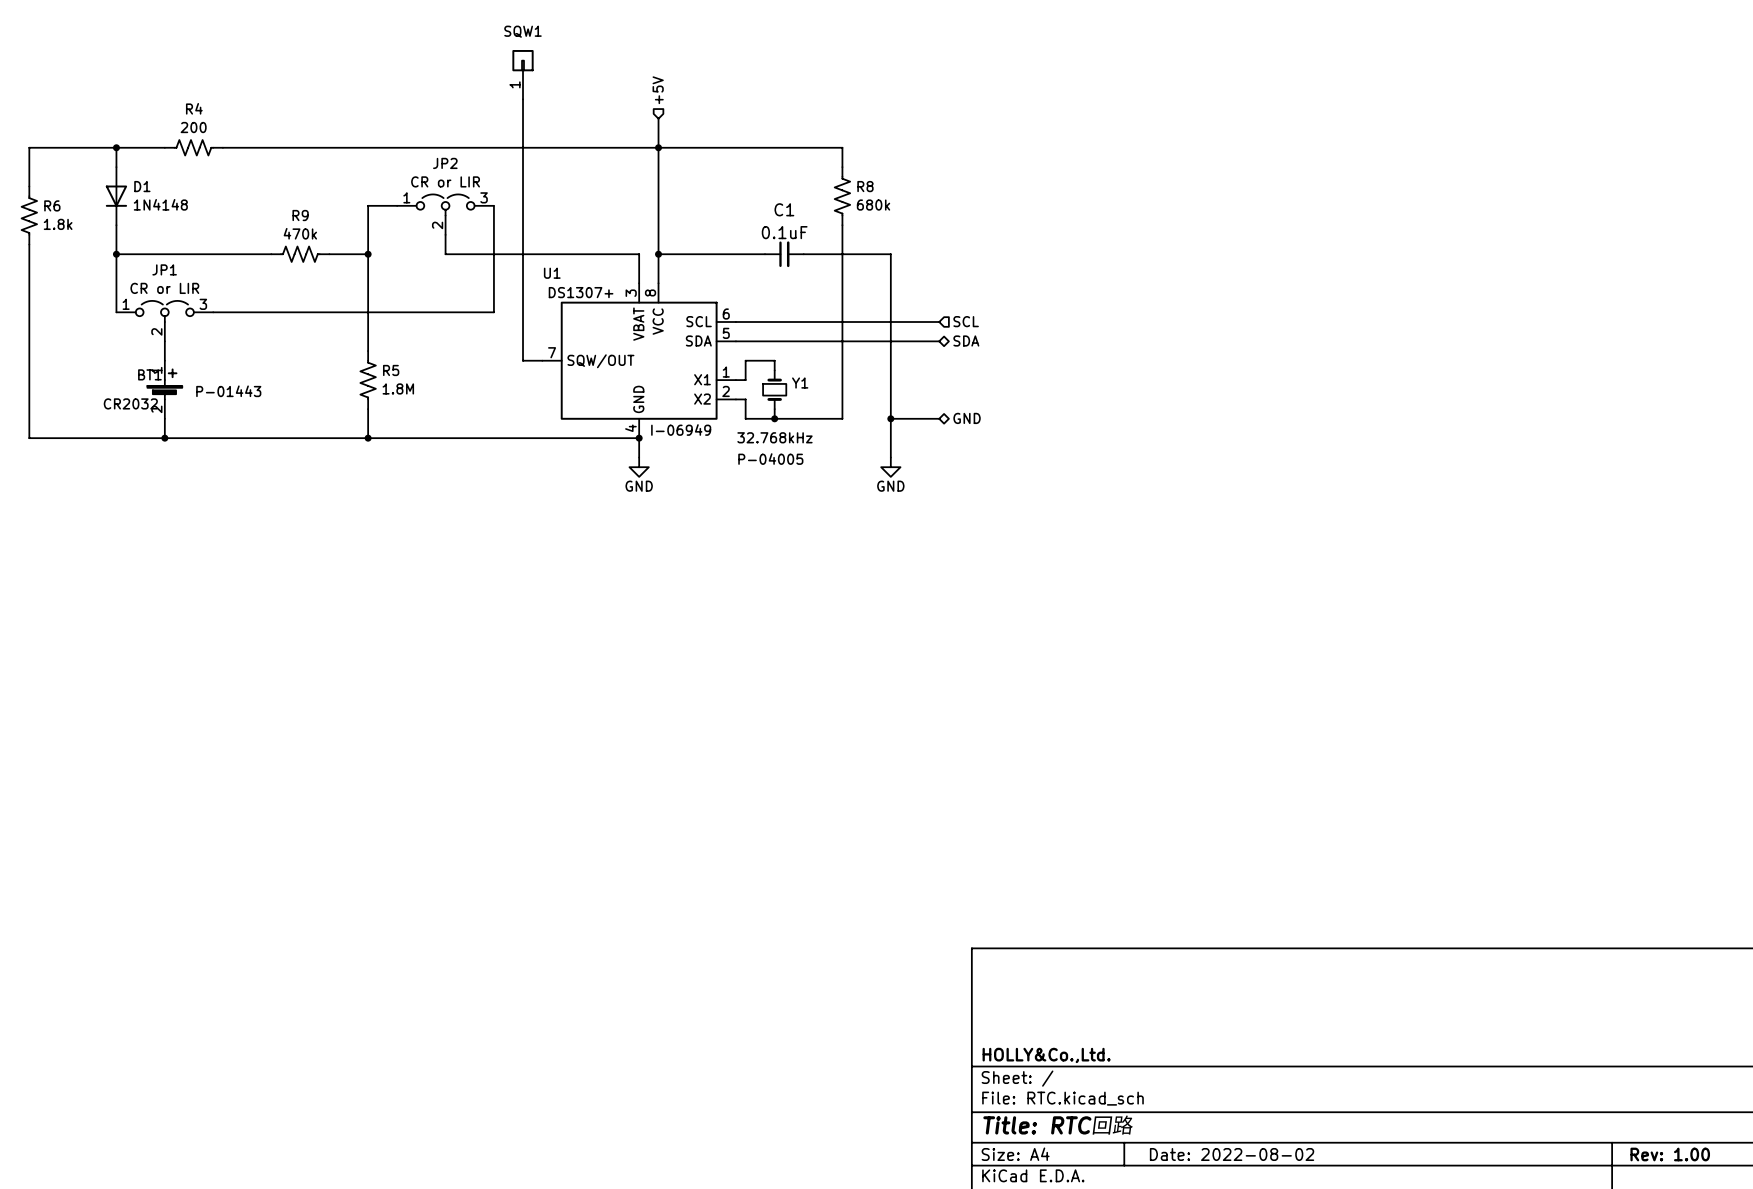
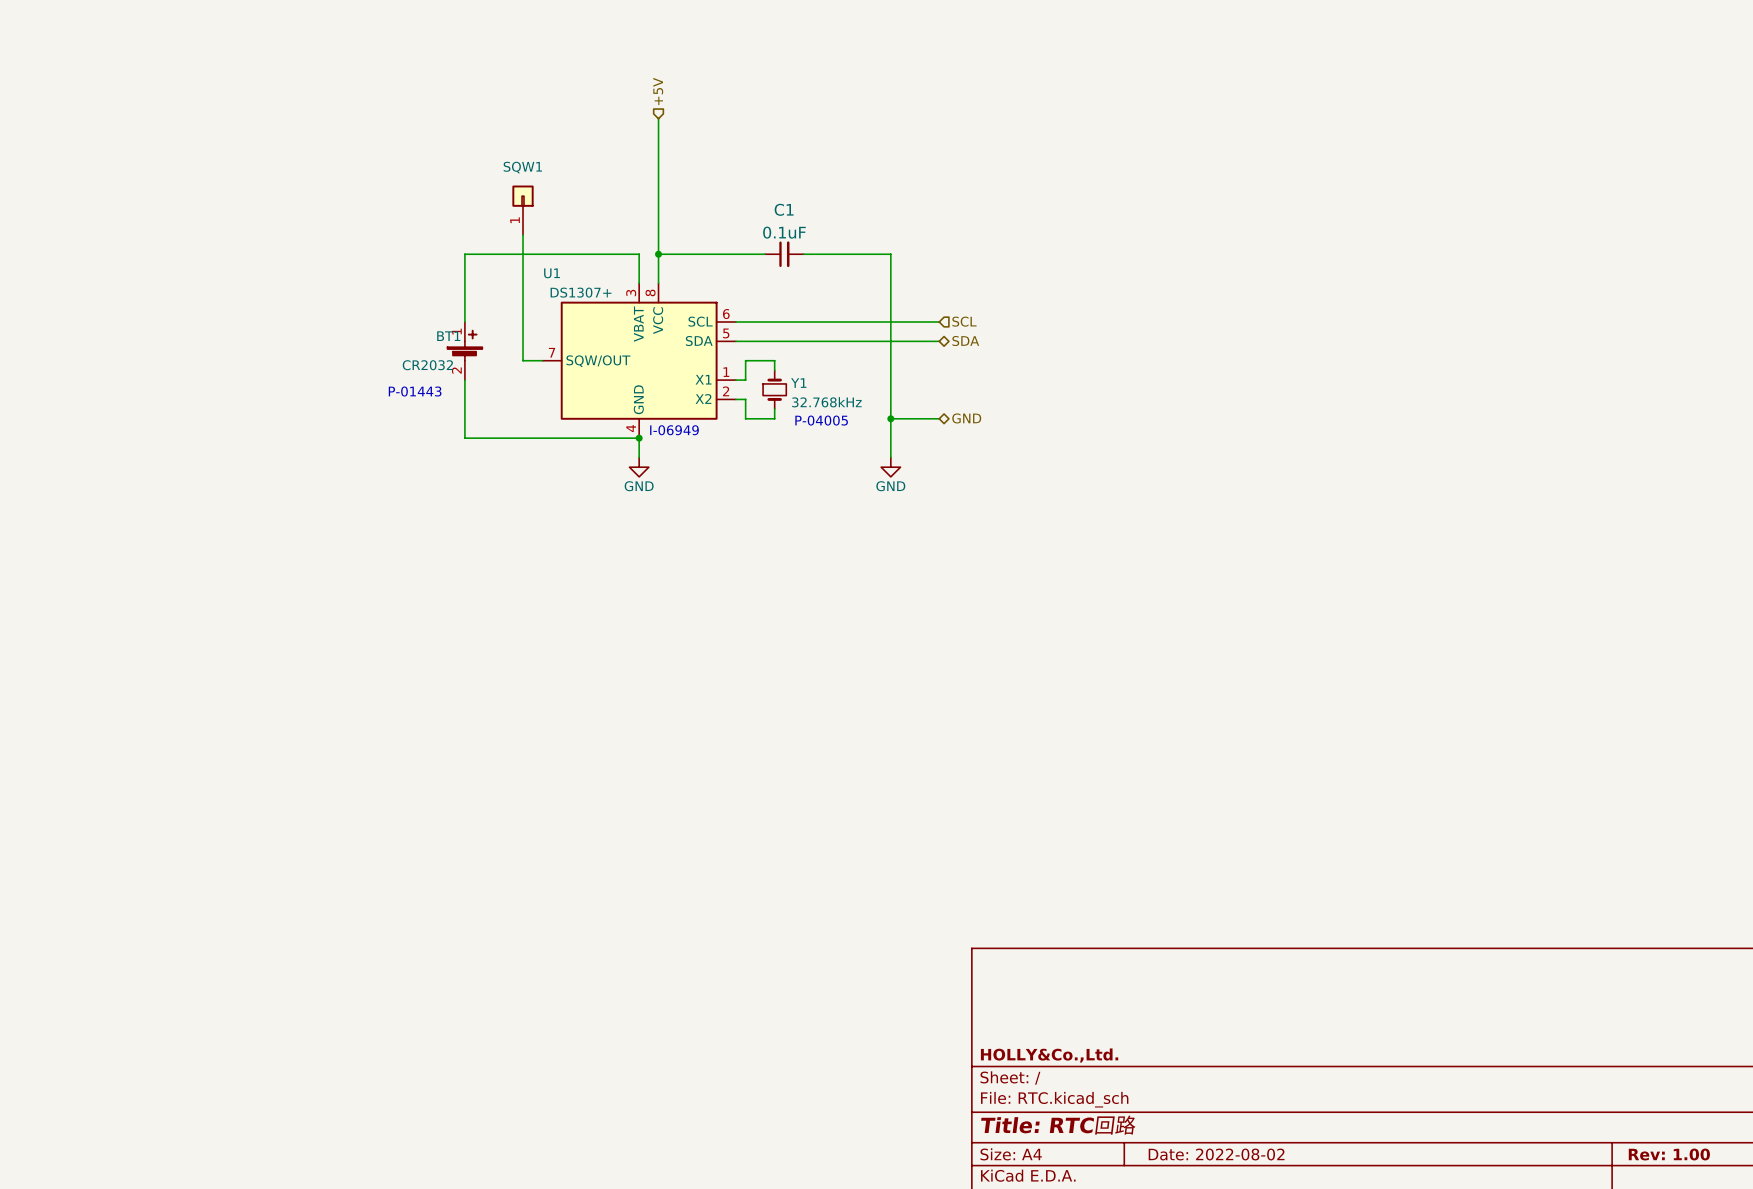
SQW1 position: (523, 74) -> (523, 210)
wire: (523, 99) (523, 234) -> none
wire: (116, 147) (116, 167) -> none
junction: (116, 147) -> none
wire: (164, 147) (29, 147) (29, 186) -> none
R4: 200 (193, 147) -> none
wire: (222, 147) (842, 147) (842, 167) -> none
junction: (658, 147) -> none
D1: 1N4148 (116, 196) -> none
R8: 680k (842, 196) -> none
wire: (397, 205) (368, 205) (368, 351) -> none
wire: (493, 205) (493, 312) (213, 312) -> none
JP2: CR or LIR (445, 214) -> none
R6: 1.8k (29, 215) -> none
wire: (116, 225) (116, 312) -> none
wire: (842, 225) (842, 418) (774, 418) -> none
wire: (445, 234) (445, 254) (464, 254) -> (464, 322) (464, 254)
wire: (29, 244) (29, 438) (464, 438) -> (464, 380) (464, 438)
wire: (116, 254) (271, 254) -> none
junction: (116, 254) -> none
R9: 470k (300, 254) -> none
wire: (329, 254) (368, 254) -> none
junction: (368, 254) -> none
JP1: CR or LIR (164, 321) -> none
wire: (164, 341) (164, 360) -> none
R5: 1.8M (368, 380) -> none
BT1 position: (164, 389) -> (464, 351)
text: P-01443 (228, 391) -> none
text: none -> P-01443 (415, 391)
wire: (368, 409) (368, 438) -> none
wire: (164, 418) (164, 438) -> none
junction: (774, 418) -> none
Y1 value position: 32.768kHz (774, 437) -> 32.768kHz (826, 402)
junction: (164, 438) -> none
junction: (368, 438) -> none
text position: P-04005 (770, 459) -> P-04005 (821, 420)

